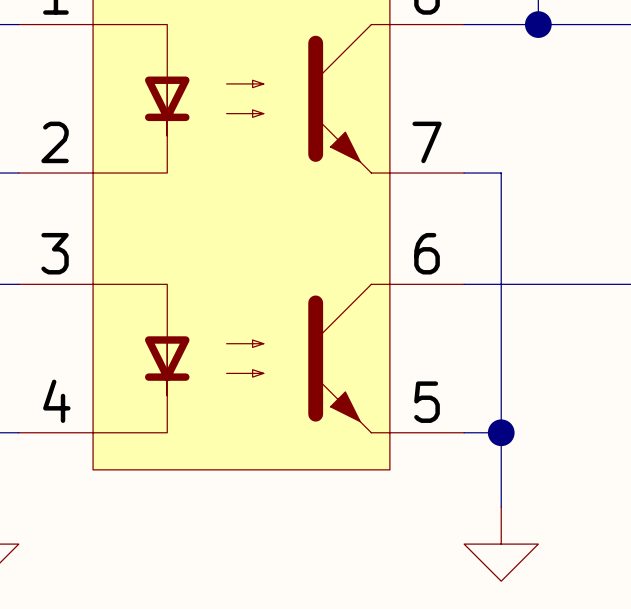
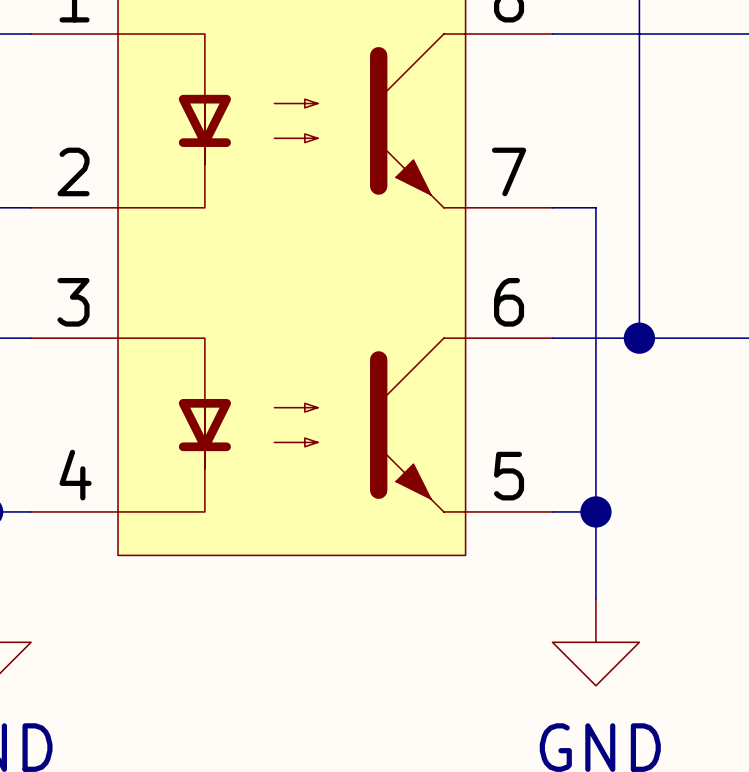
wire: none -> (639, 34) (639, 338)
junction: (538, 24) -> none
junction: none -> (639, 338)

